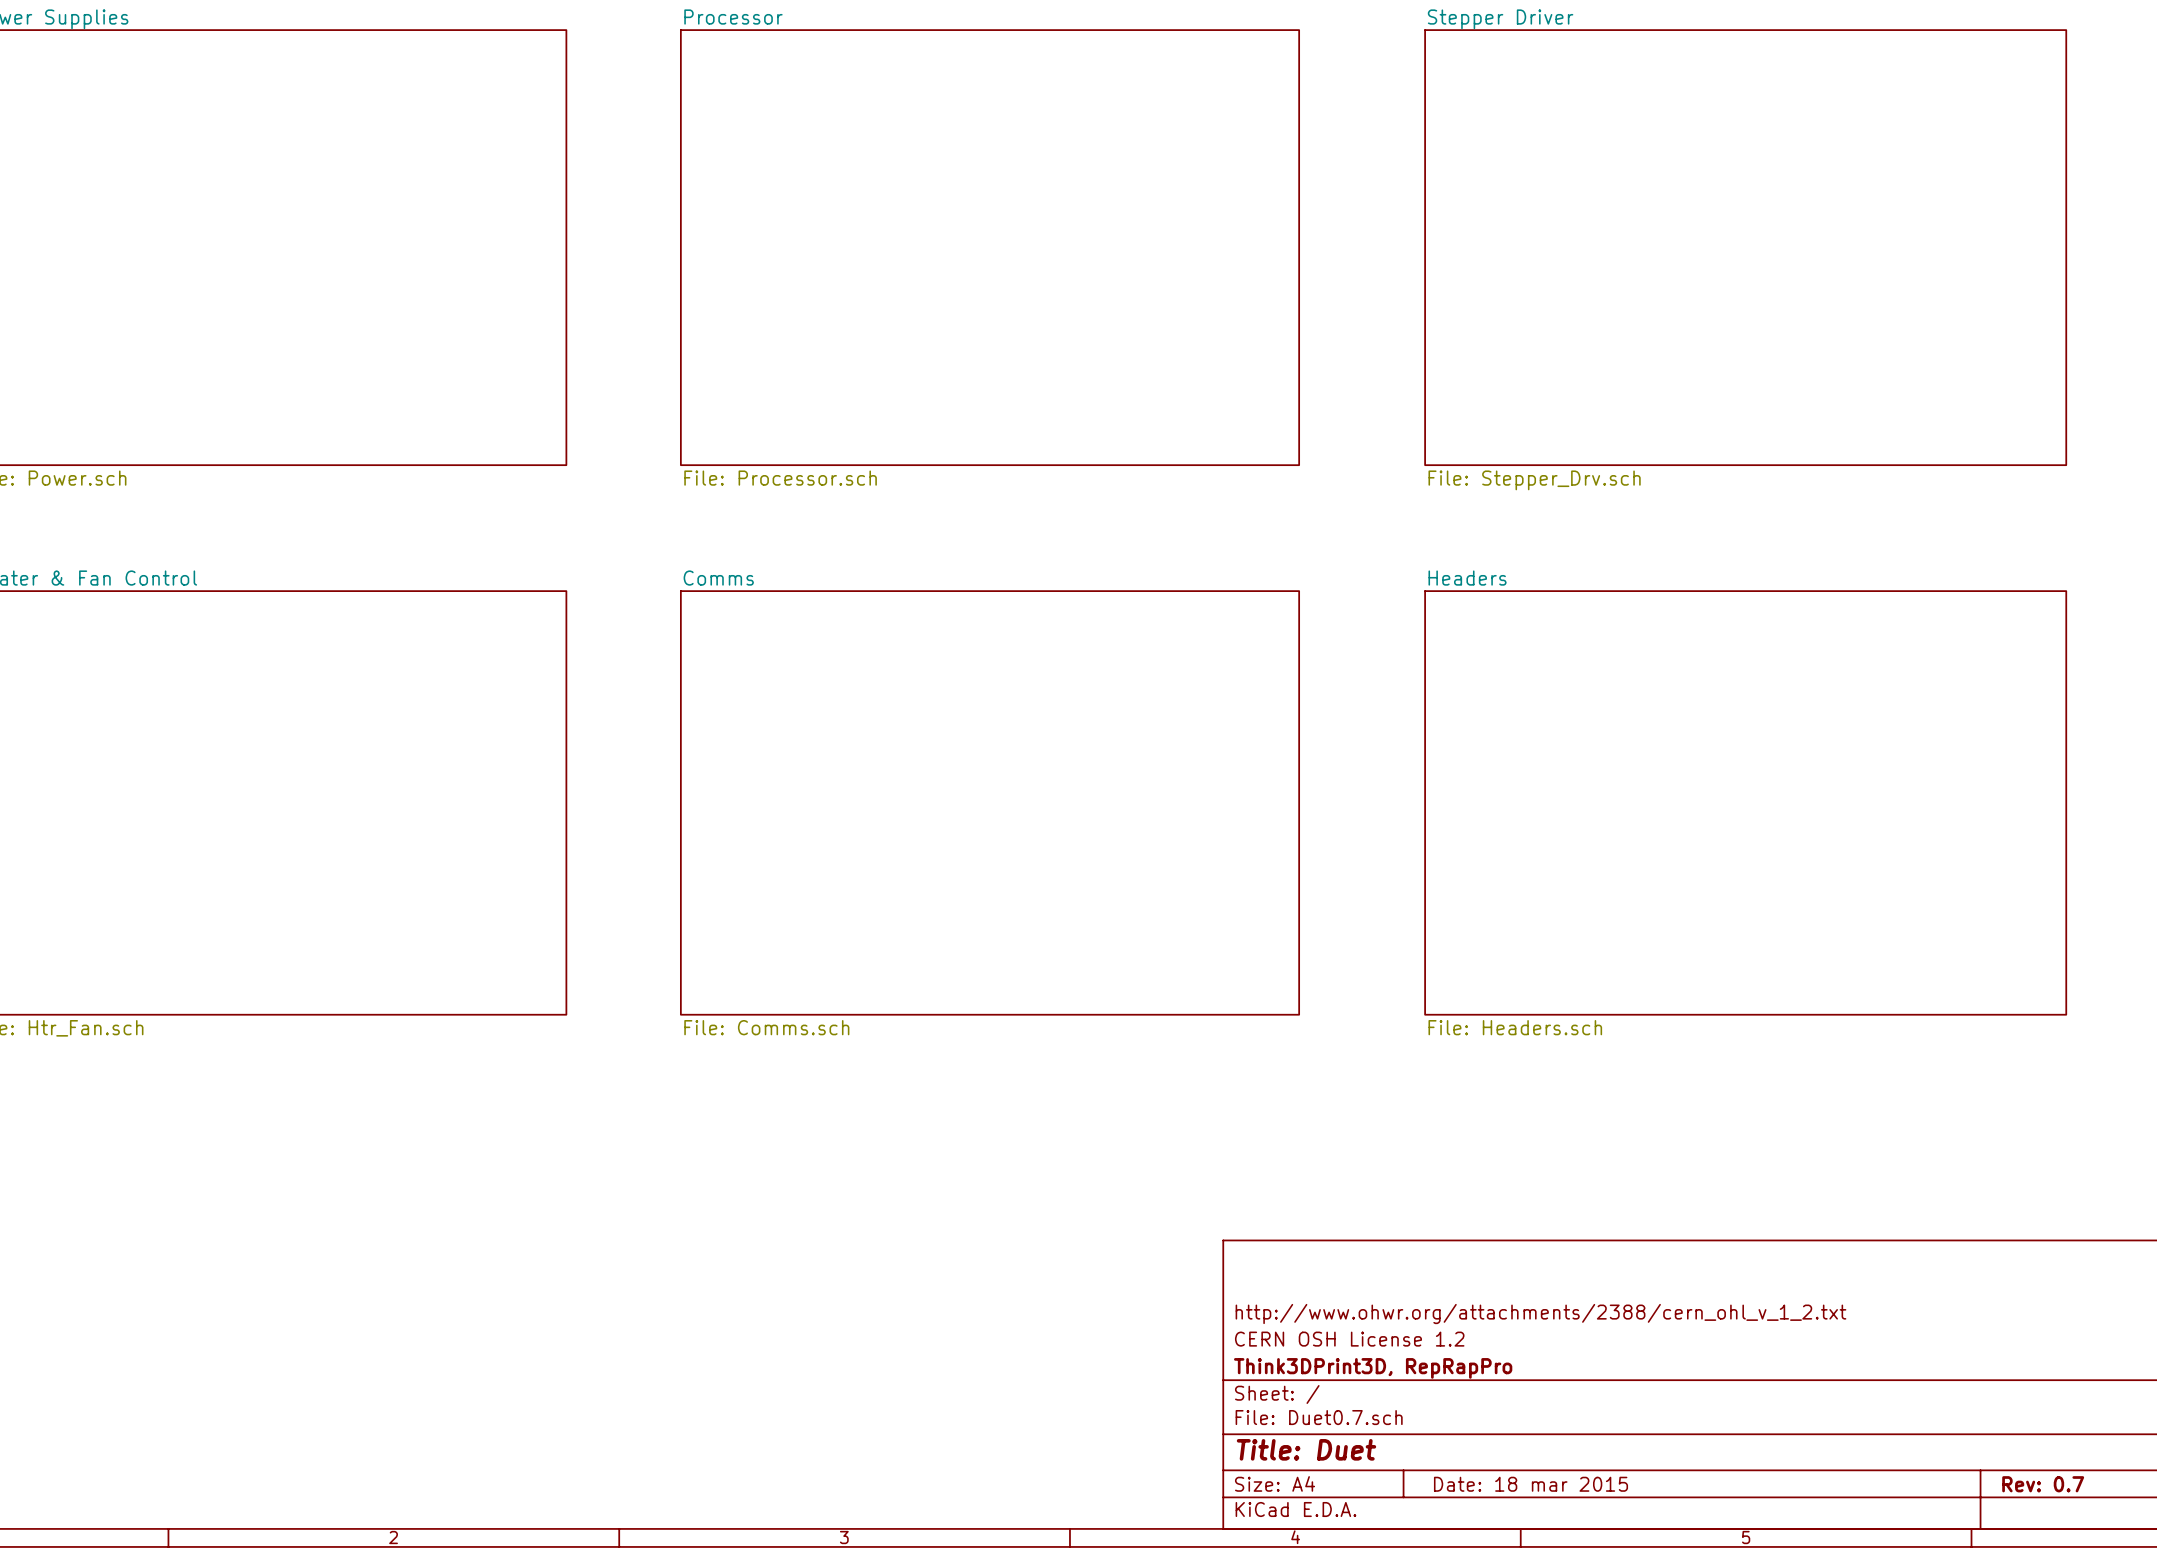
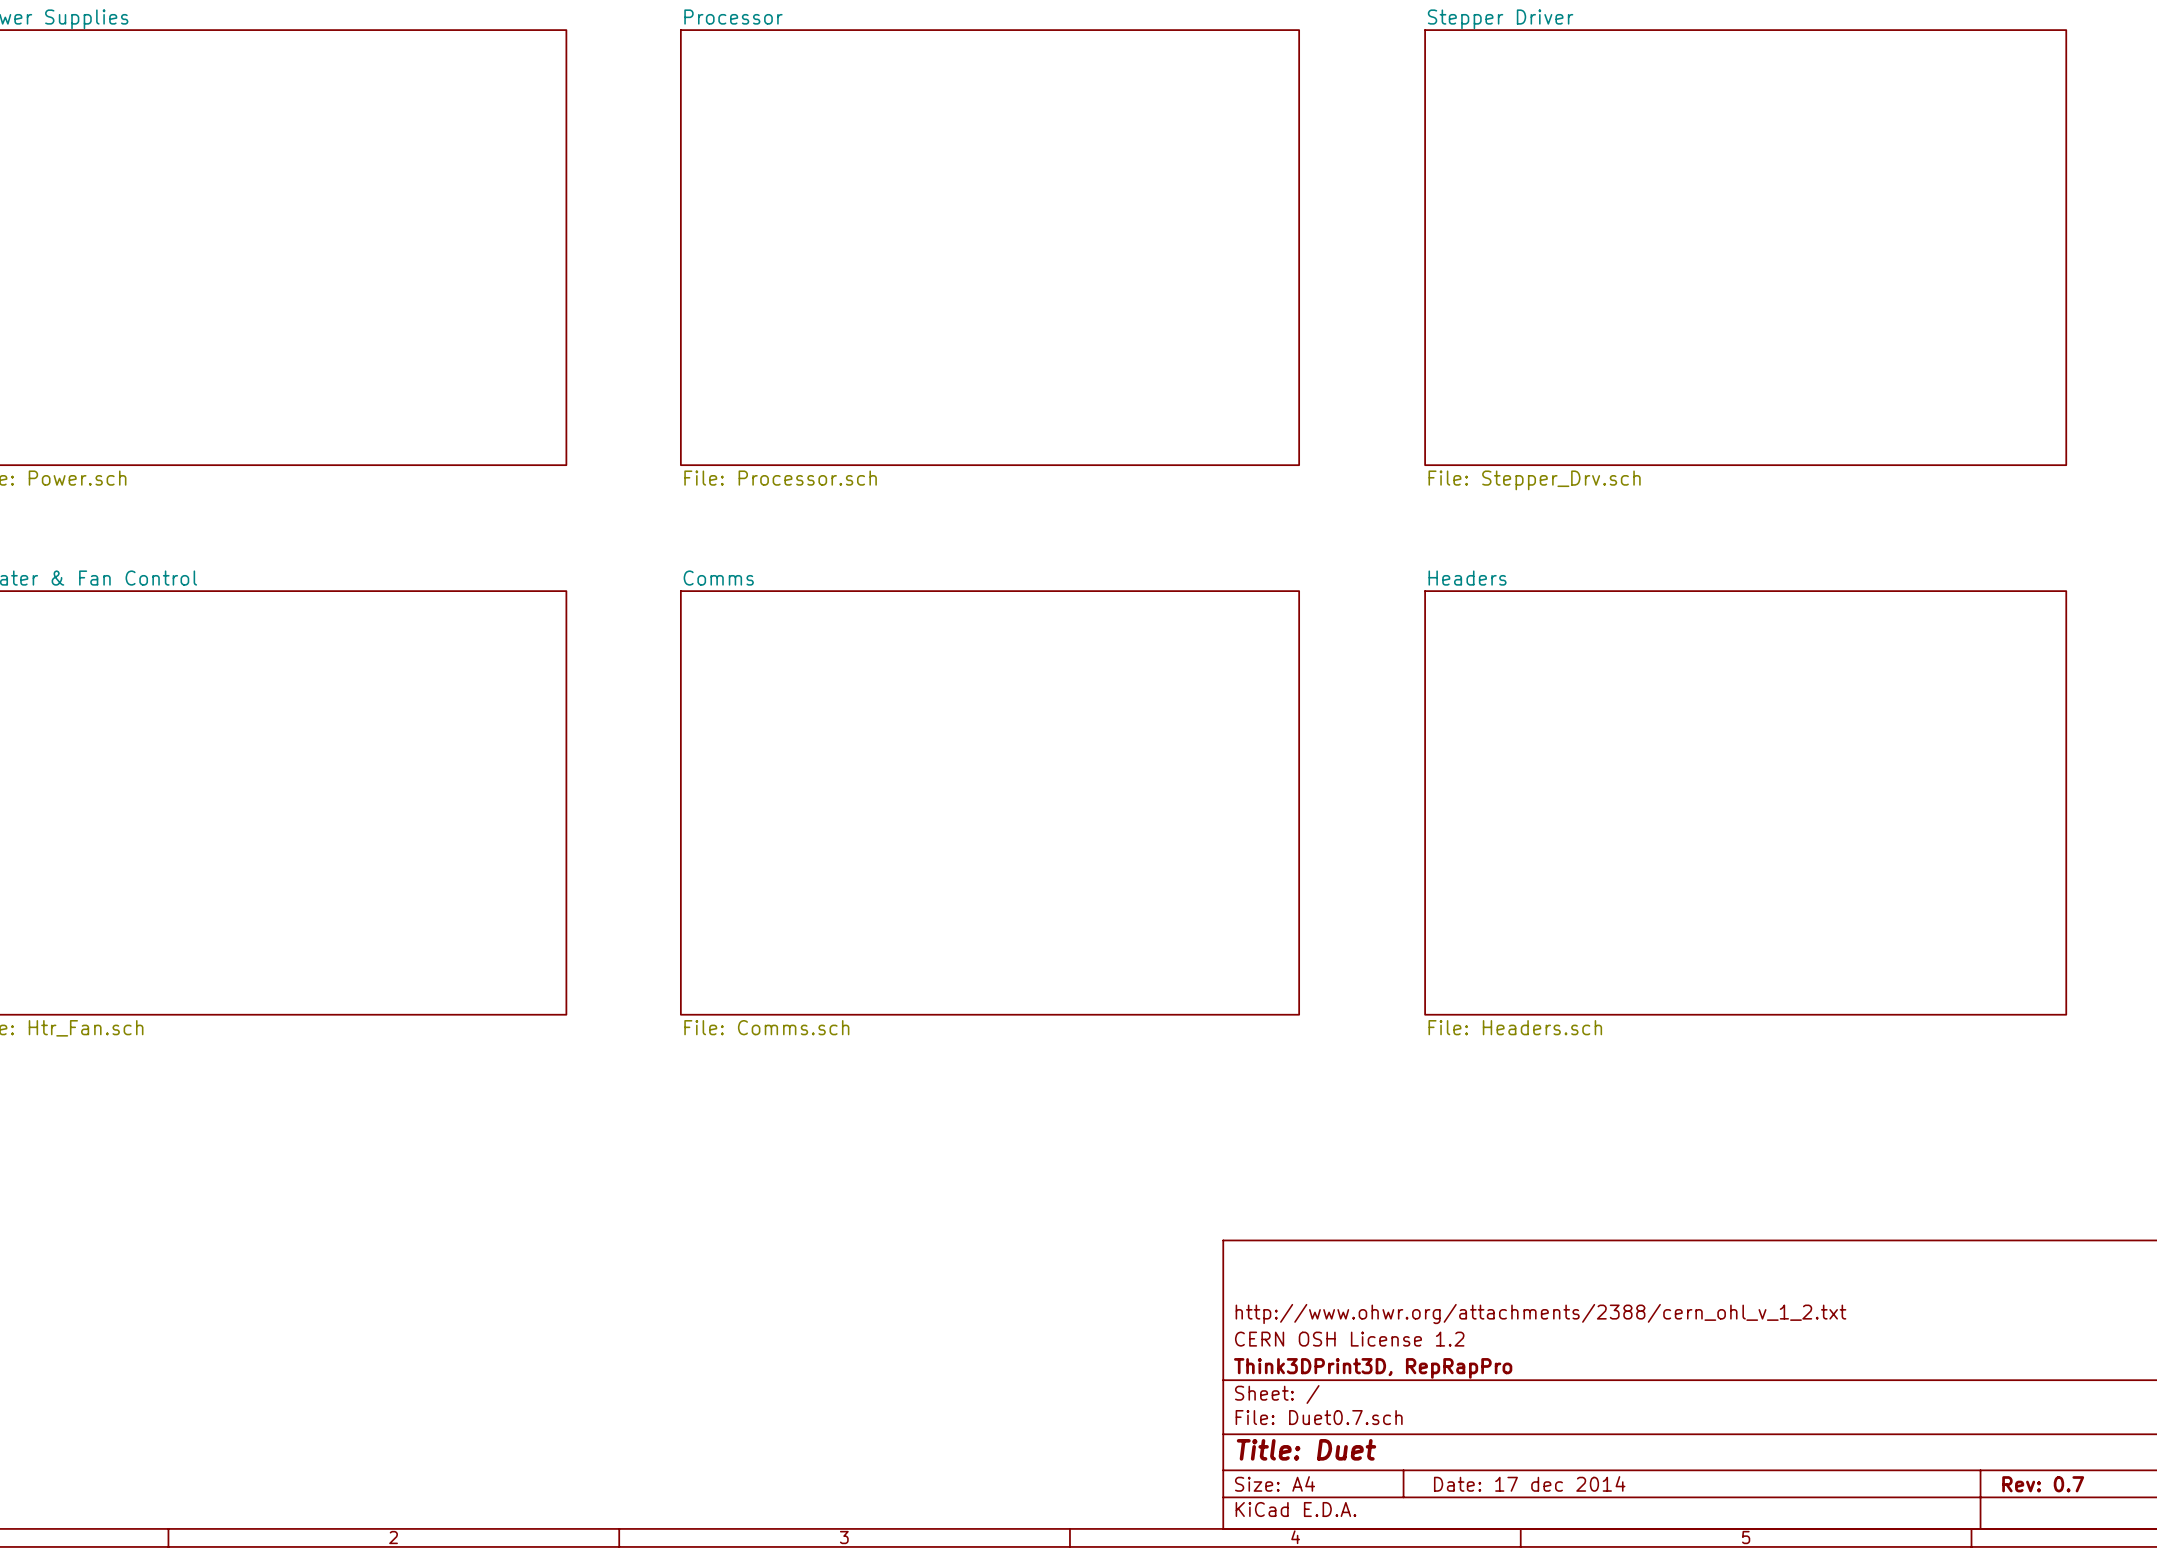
title block: Date: 18 mar 2015 (1531, 1484) -> Date: 17 dec 2014 (1529, 1483)

